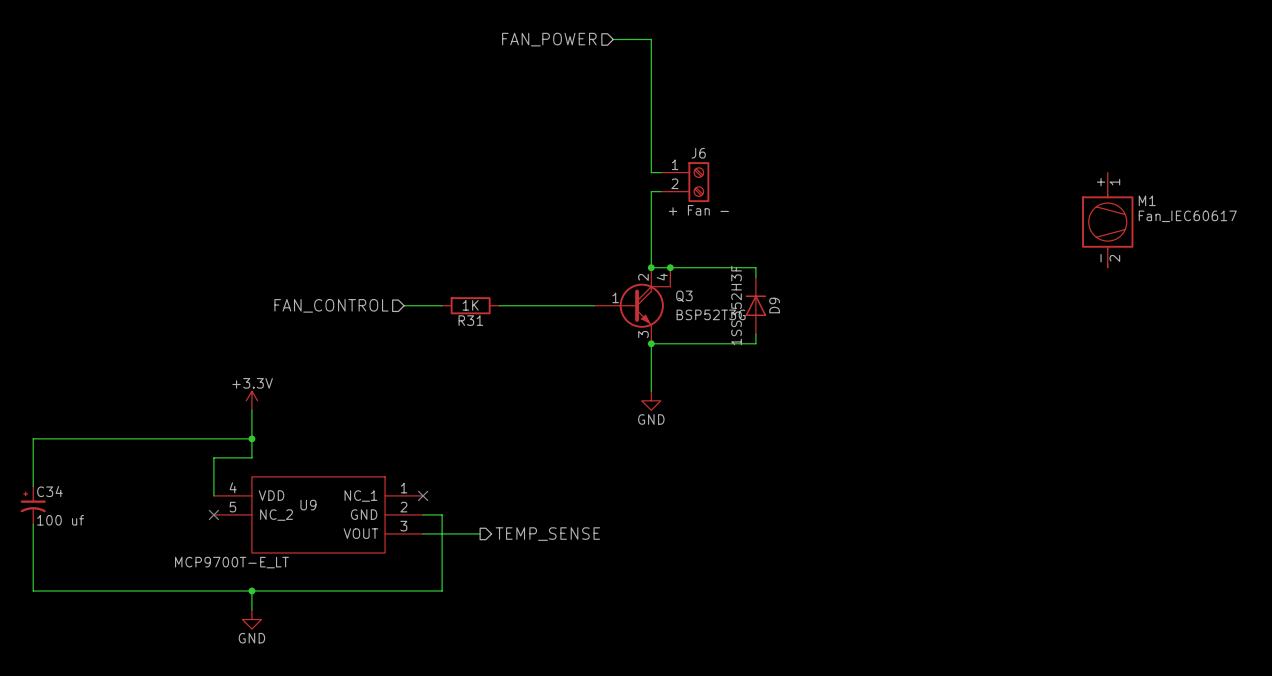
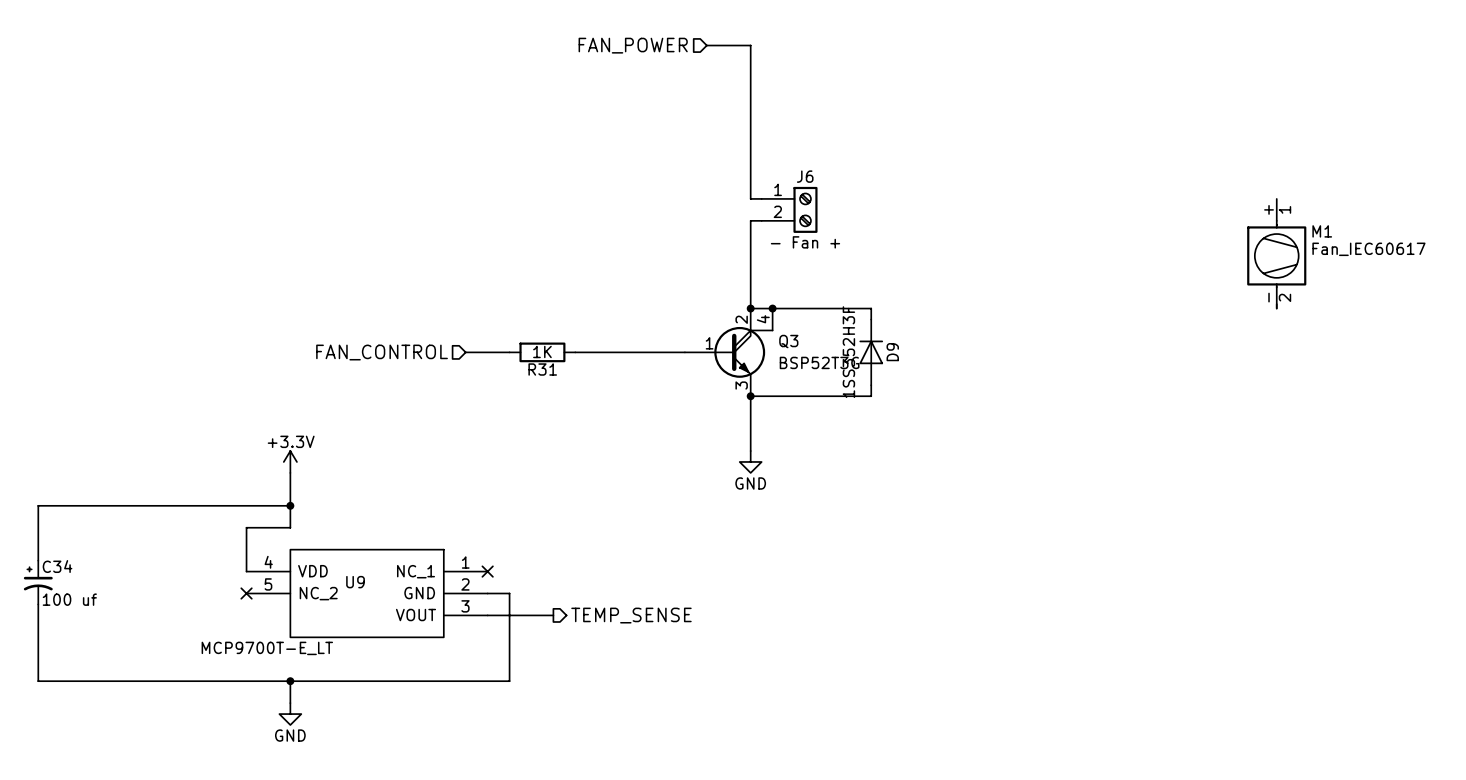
J6 value: + Fan - (698, 210) -> - Fan + (805, 242)

